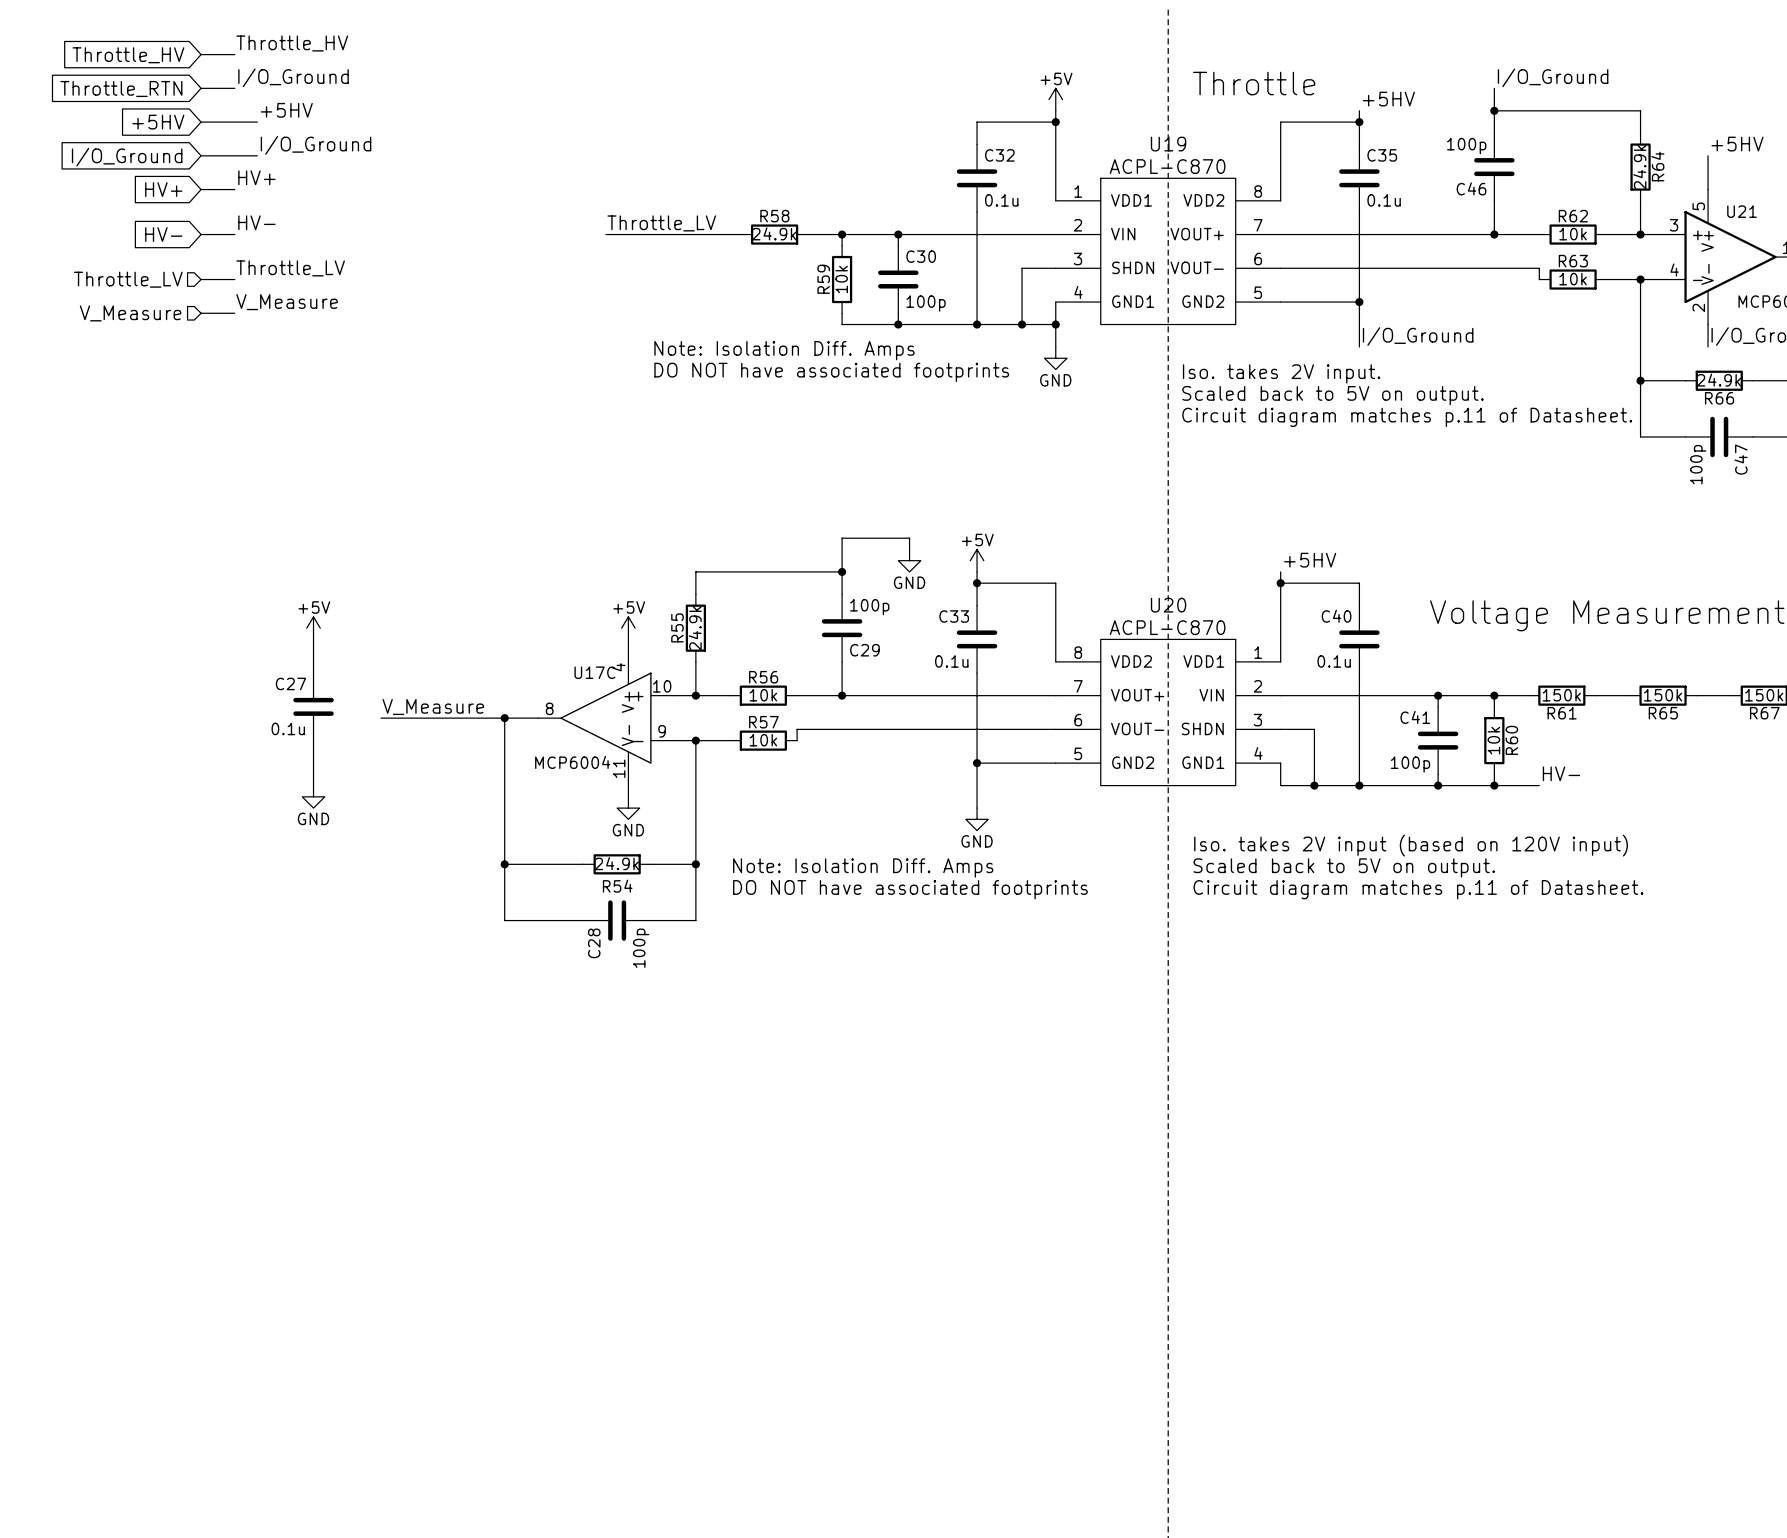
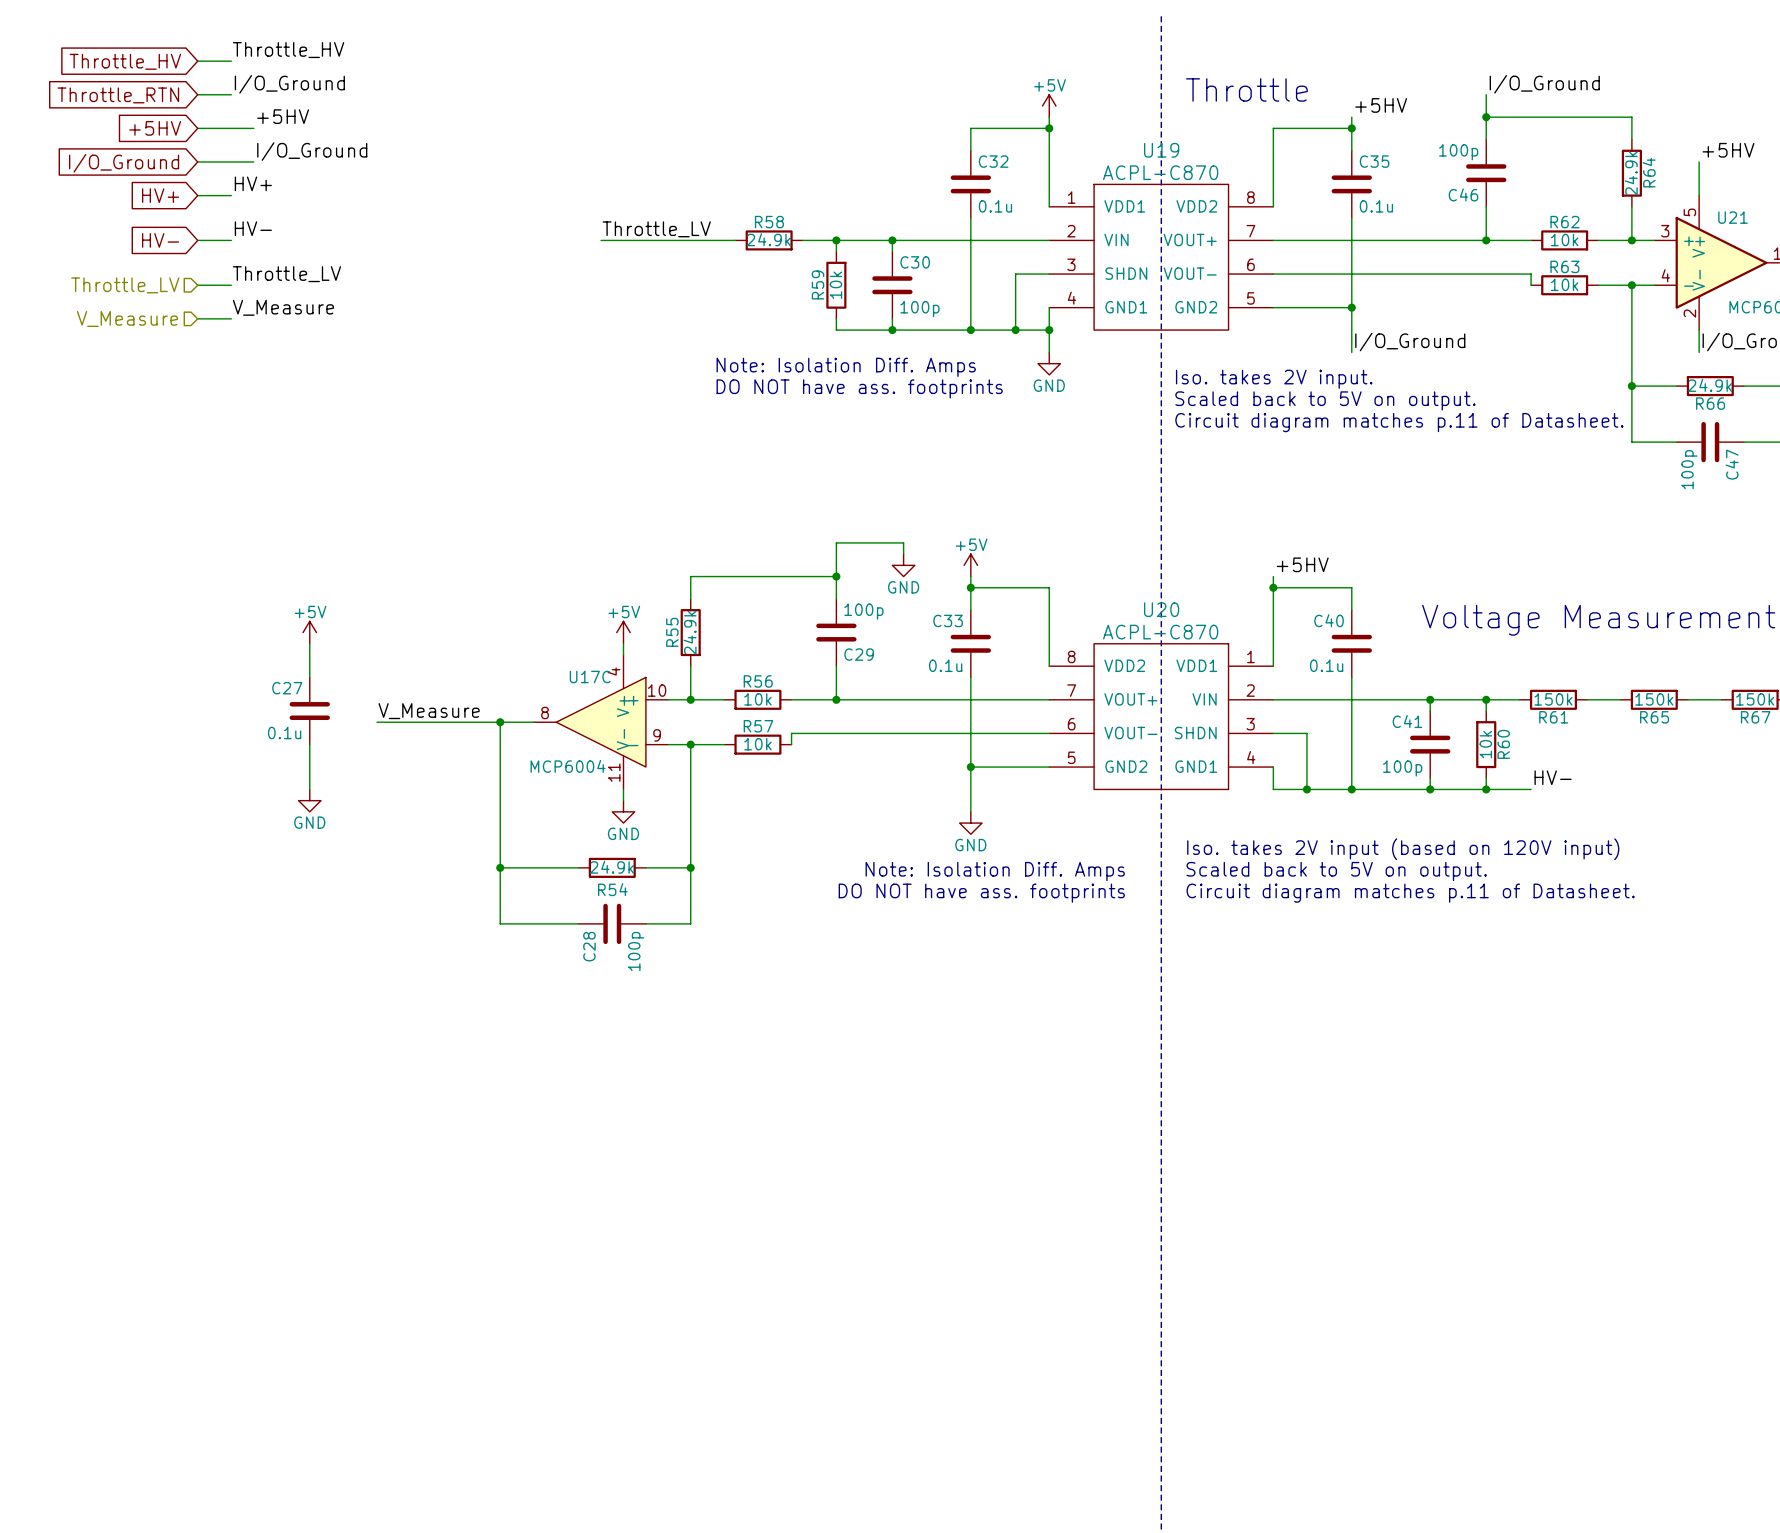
text position: Note: Isolation Diff. Amps (784, 350) -> Note: Isolation Diff. Amps (846, 367)
text: DO NOT have associated footprints (831, 372) -> DO NOT have ass. footprints (859, 388)
text: Note: Isolation Diff. Amps (863, 867) -> none
text: none -> Note: Isolation Diff. Amps (995, 871)
text: DO NOT have associated footprints (910, 889) -> none
text: none -> DO NOT have ass. footprints (981, 893)

